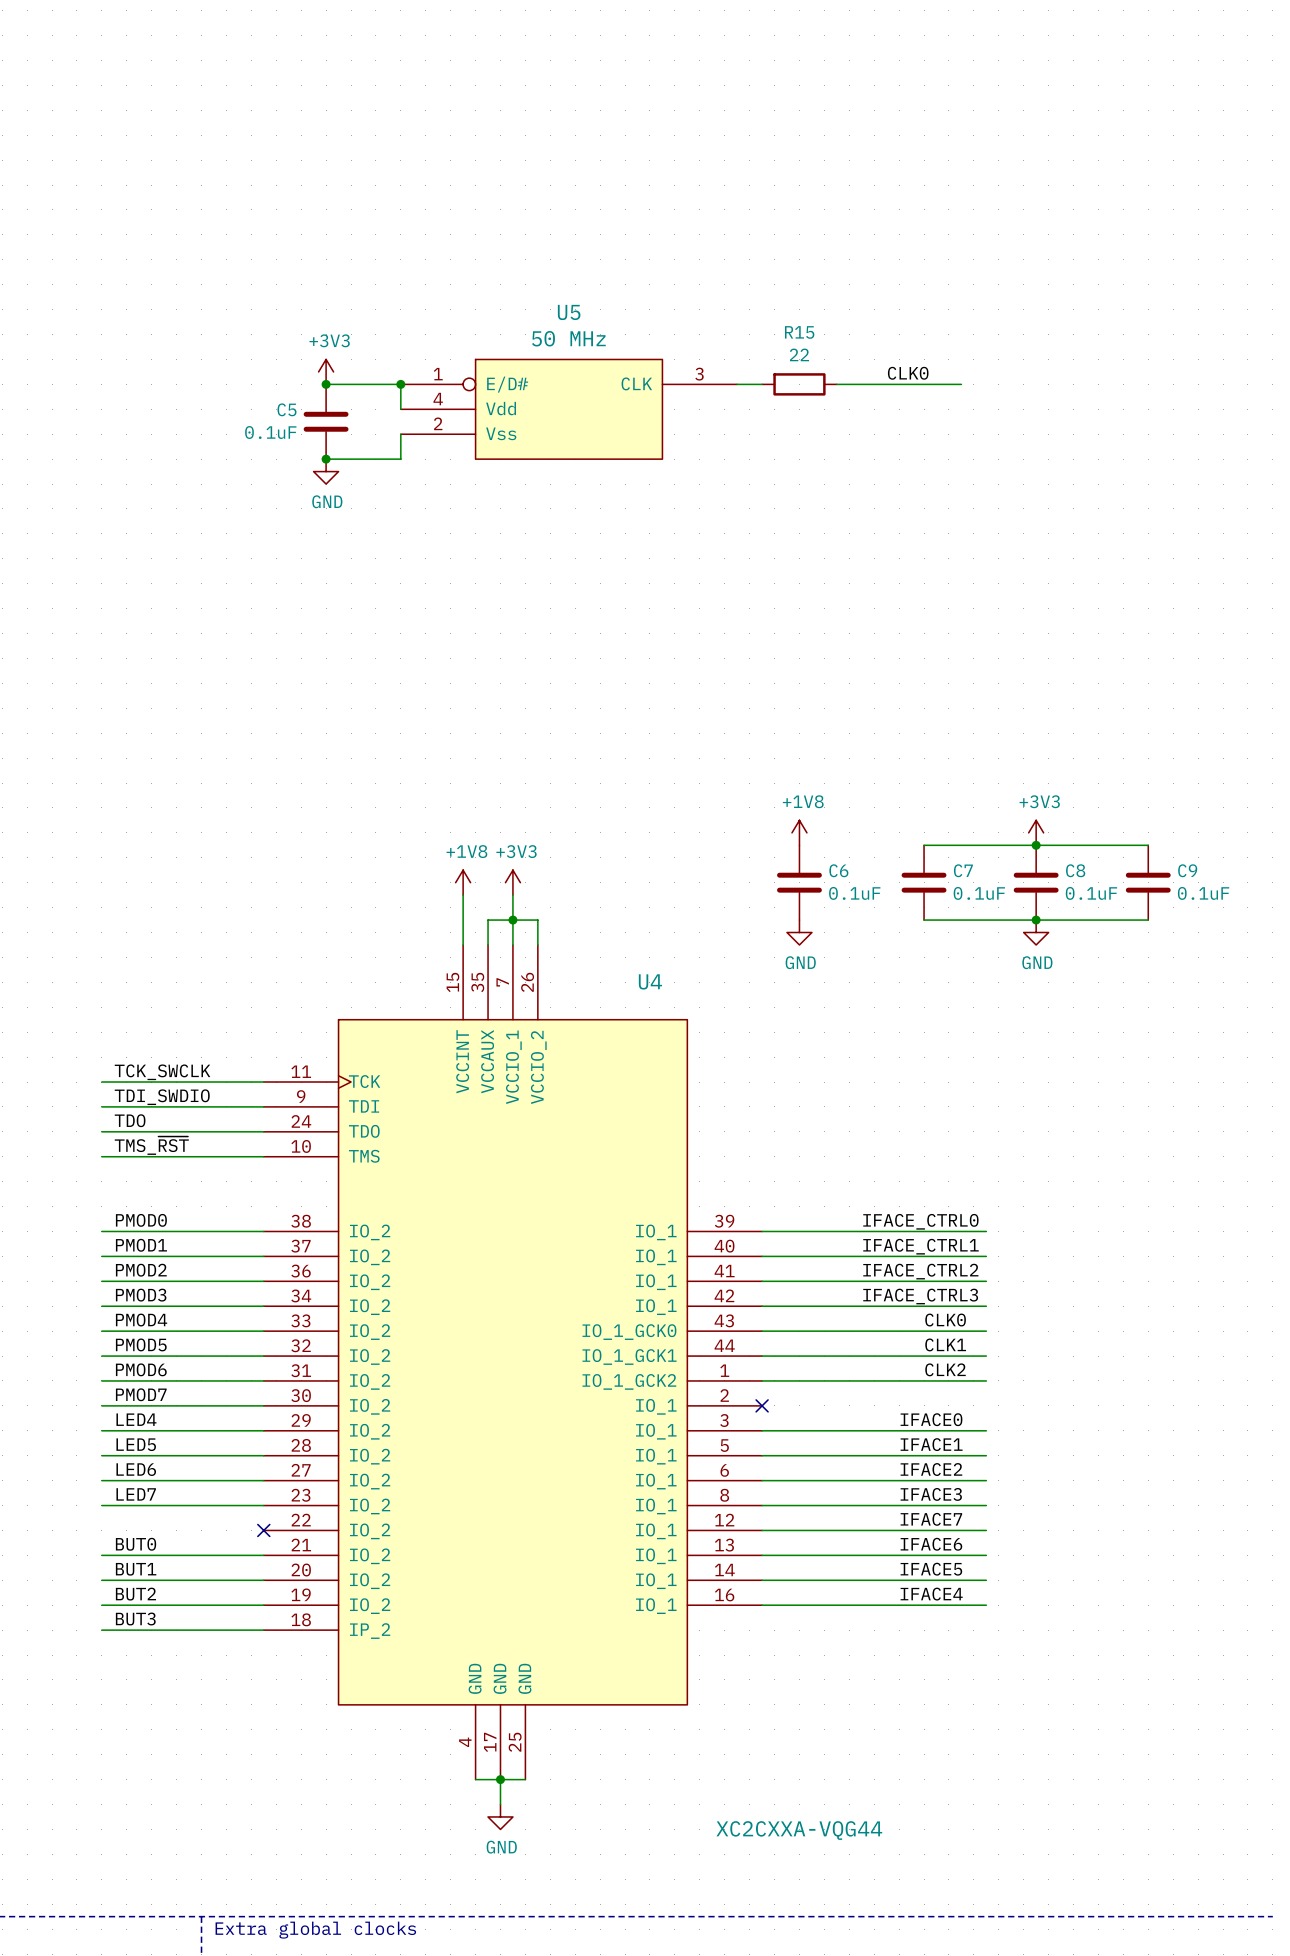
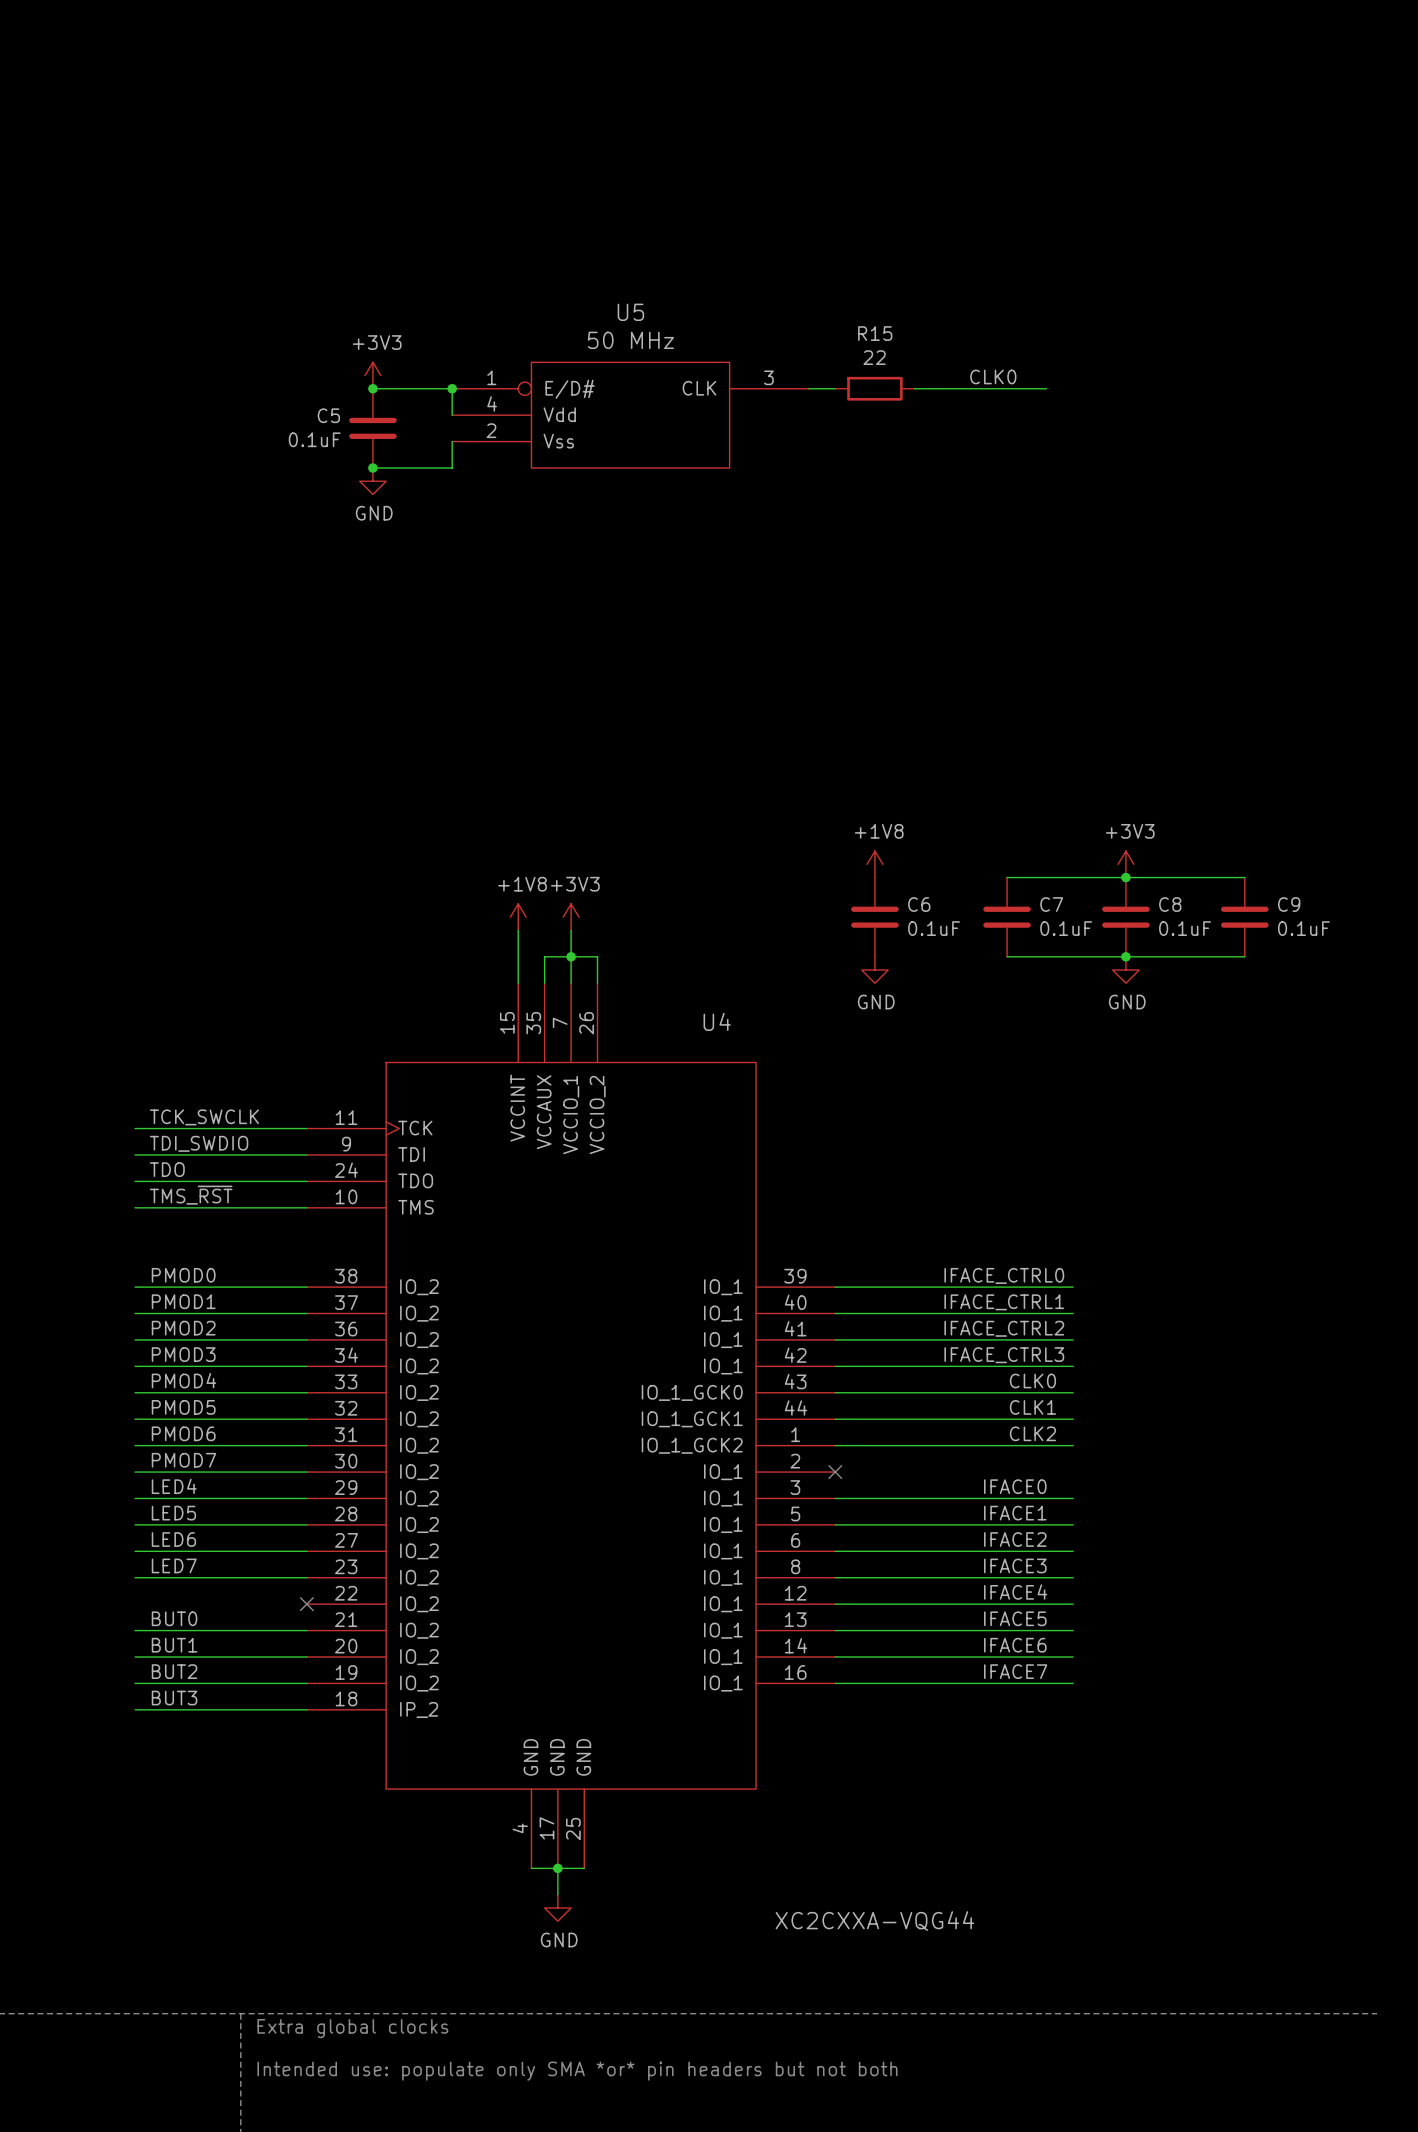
label: IFACE7 (931, 1519) -> IFACE4 (1015, 1592)
label: IFACE6 (931, 1544) -> IFACE5 (1015, 1618)
label: IFACE5 (931, 1569) -> IFACE6 (1015, 1645)
label: IFACE4 (931, 1594) -> IFACE7 (1015, 1671)

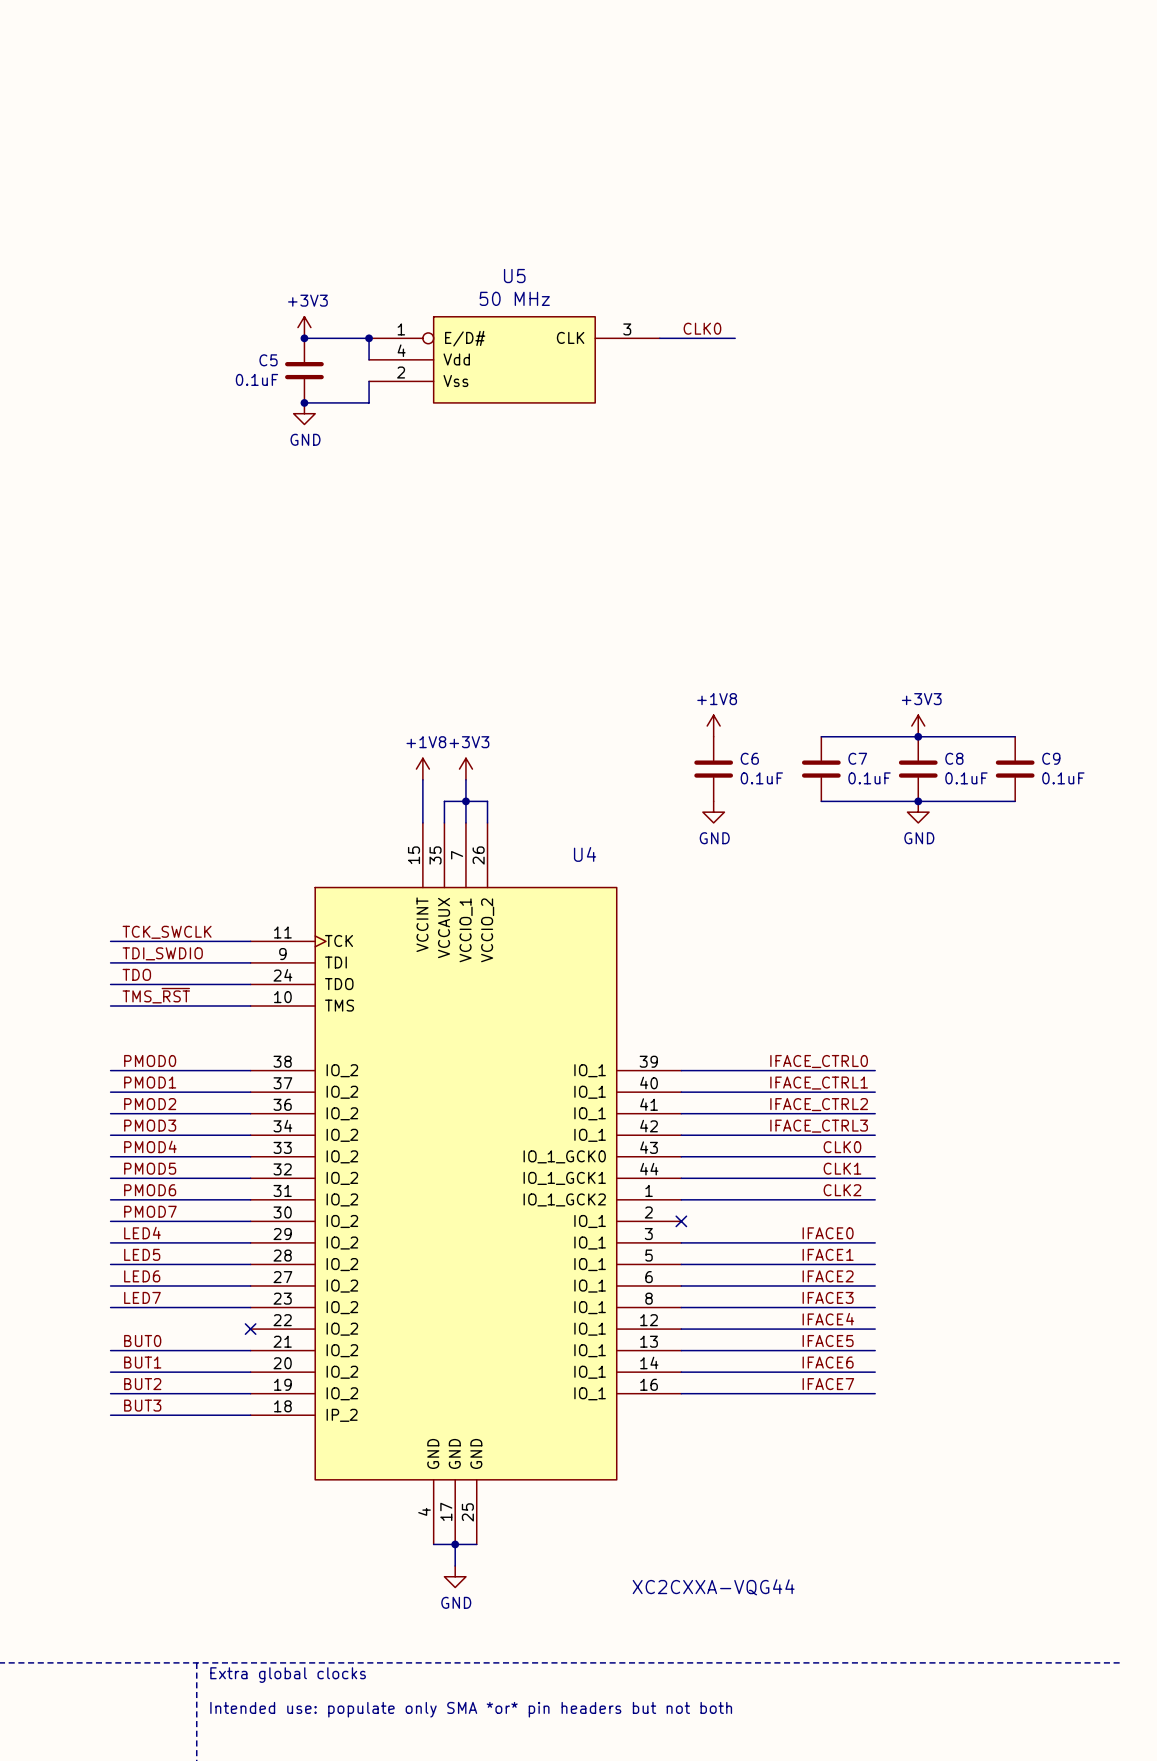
label position: CLK0 (993, 376) -> CLK0 (702, 328)
wire: none -> (681, 338) (735, 338)
R15: 22 (874, 388) -> none
wire: (914, 388) (1046, 388) -> none

